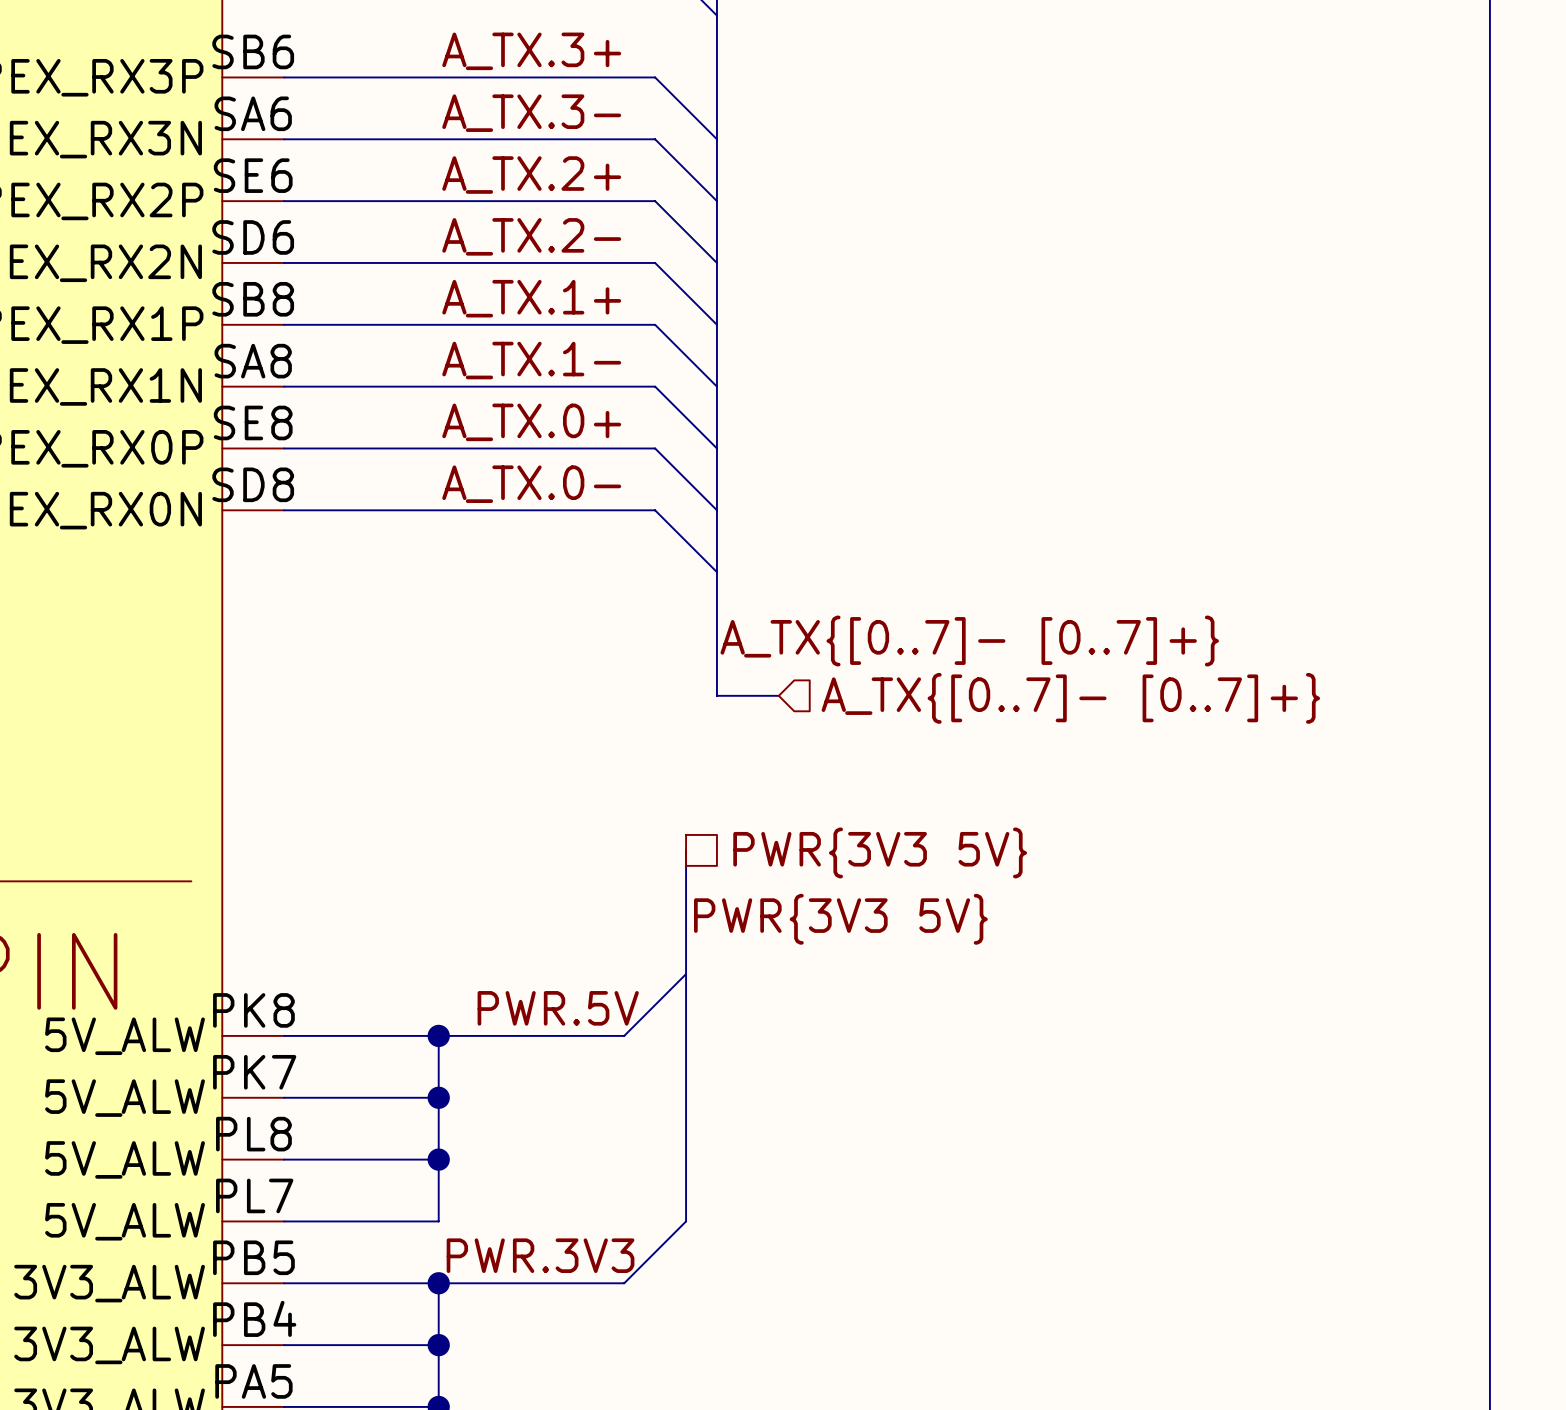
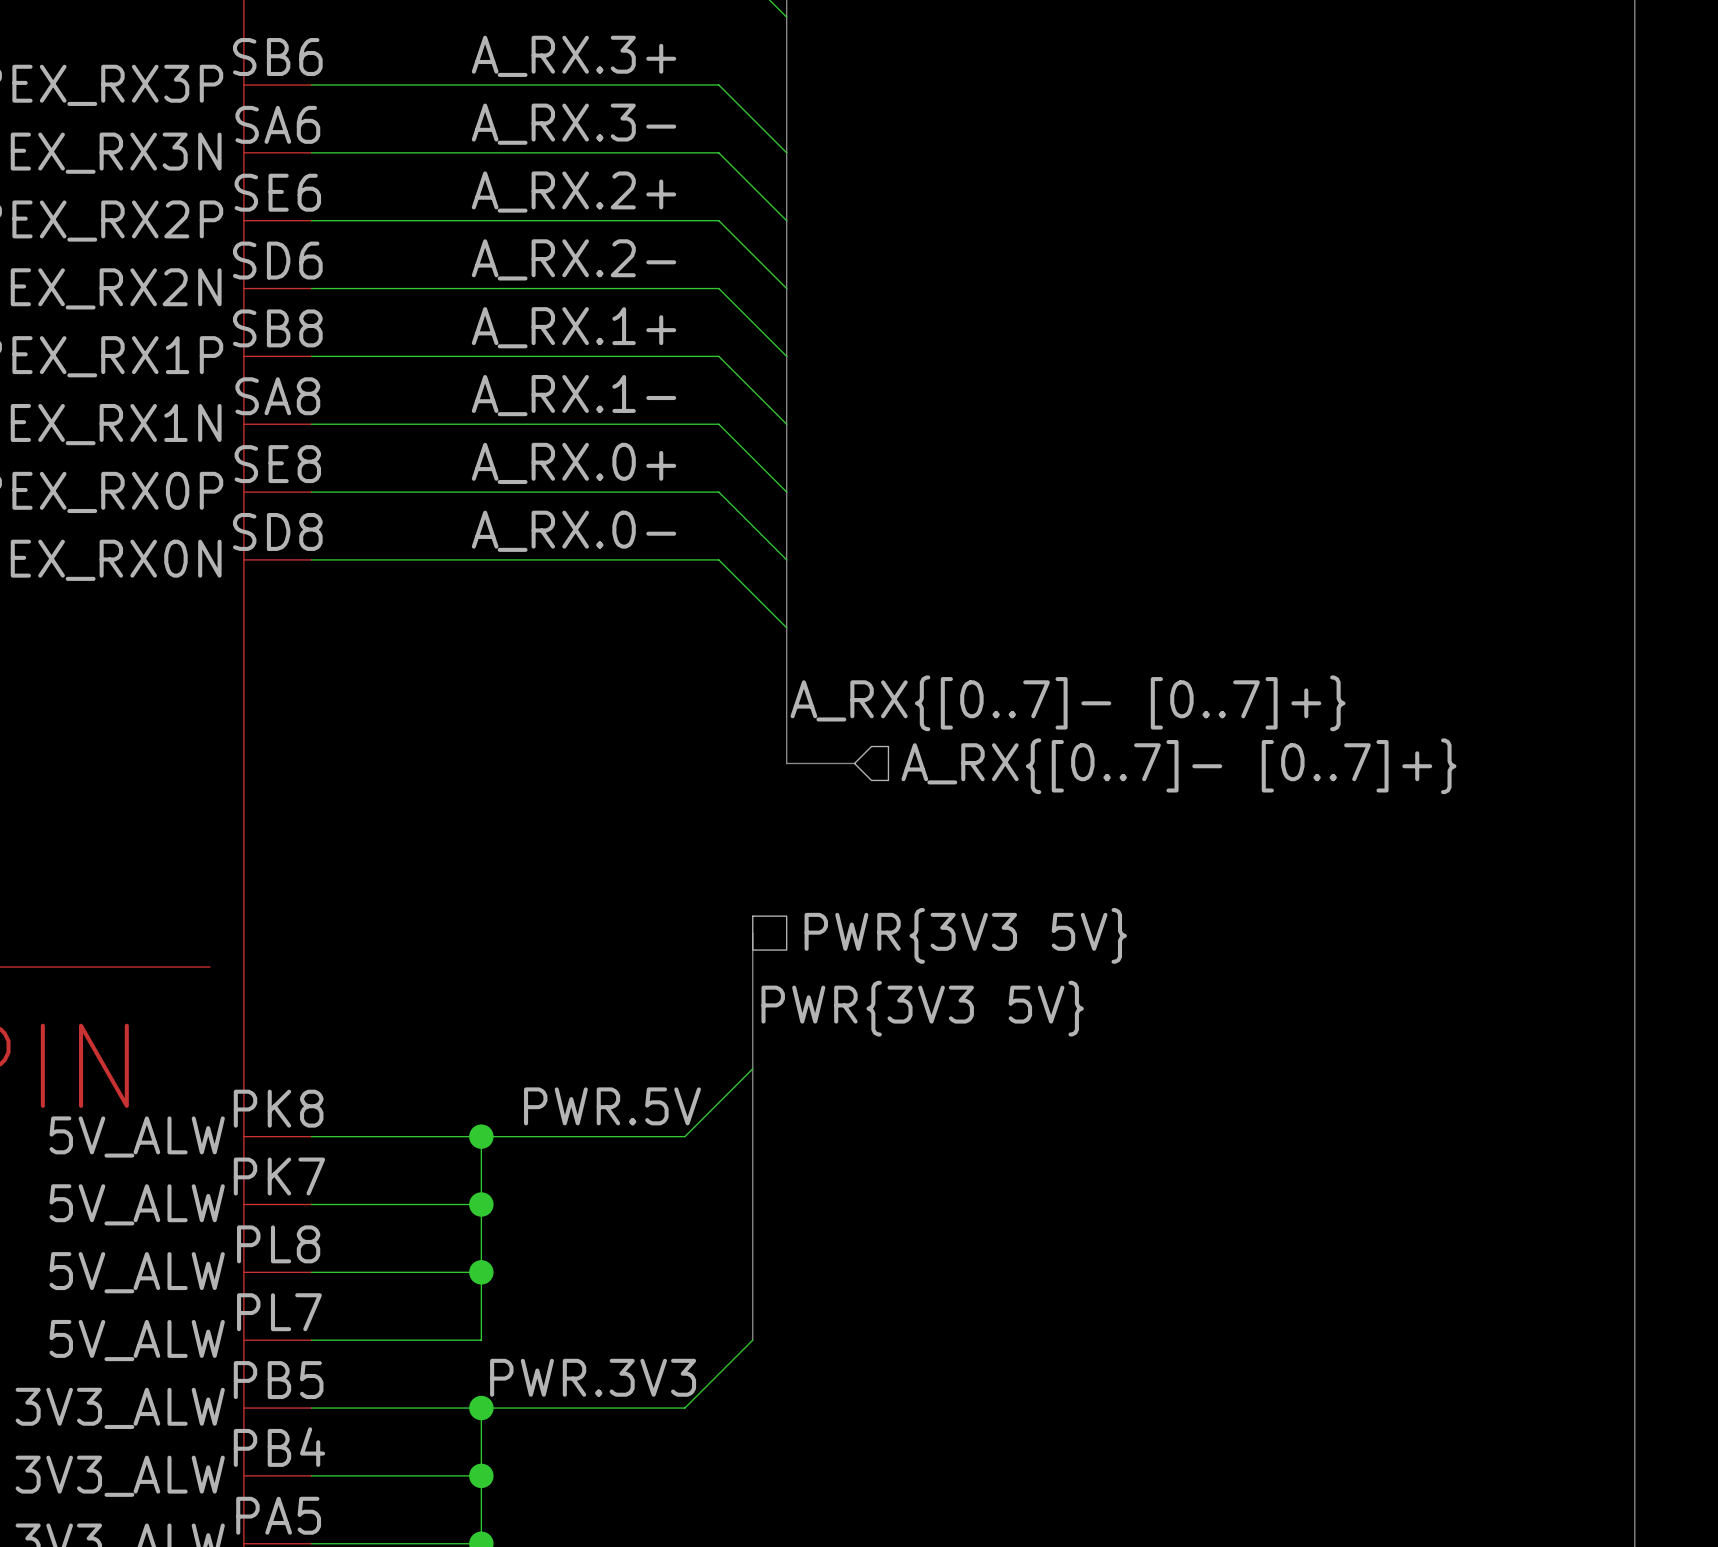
label: none -> A_RX.3+ (574, 56)
label: A_TX.3+ (531, 51) -> none
label: none -> A_RX.3- (574, 124)
label: A_TX.3- (531, 113) -> none
label: none -> A_RX.2+ (574, 192)
label: A_TX.2+ (531, 175) -> none
label: none -> A_RX.2- (574, 259)
label: A_TX.2- (531, 236) -> none
label: none -> A_RX.1+ (574, 327)
label: A_TX.1+ (531, 298) -> none
label: none -> A_RX.1- (574, 395)
label: A_TX.1- (531, 360) -> none
label: none -> A_RX.0+ (574, 463)
label: A_TX.0+ (531, 422) -> none
label: none -> A_RX.0- (574, 531)
label: A_TX.0- (531, 484) -> none
label: A_TX{[0..7]- [0..7]+} (969, 641) -> A_RX{[0..7]- [0..7]+} (1068, 703)
hierarchical label: A_TX{[0..7]- [0..7]+} (1070, 698) -> A_RX{[0..7]- [0..7]+} (1178, 766)

